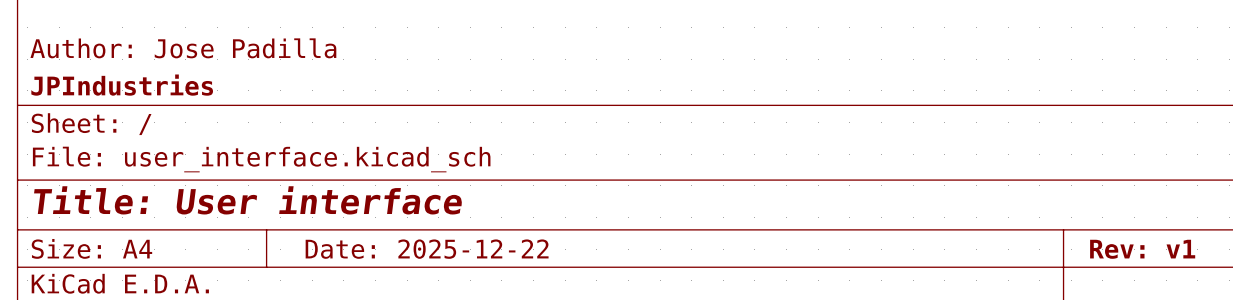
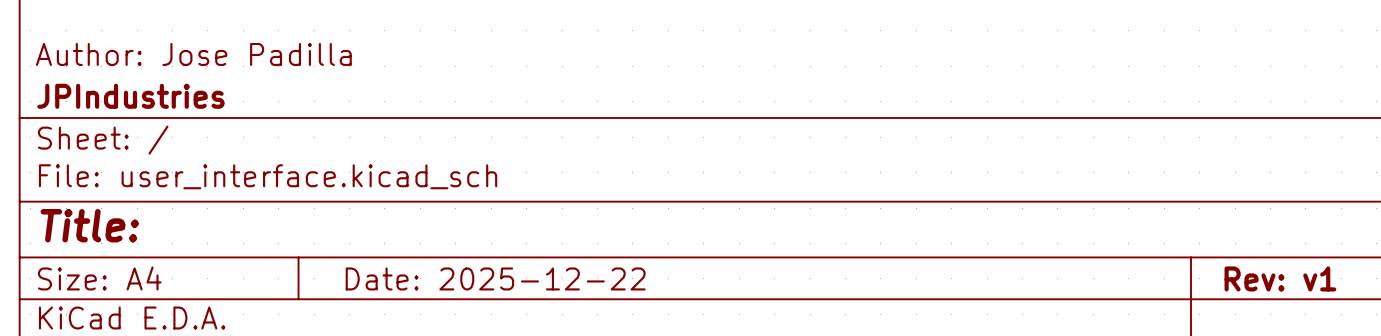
title block: Title: User interface (248, 200) -> Title: (89, 225)

